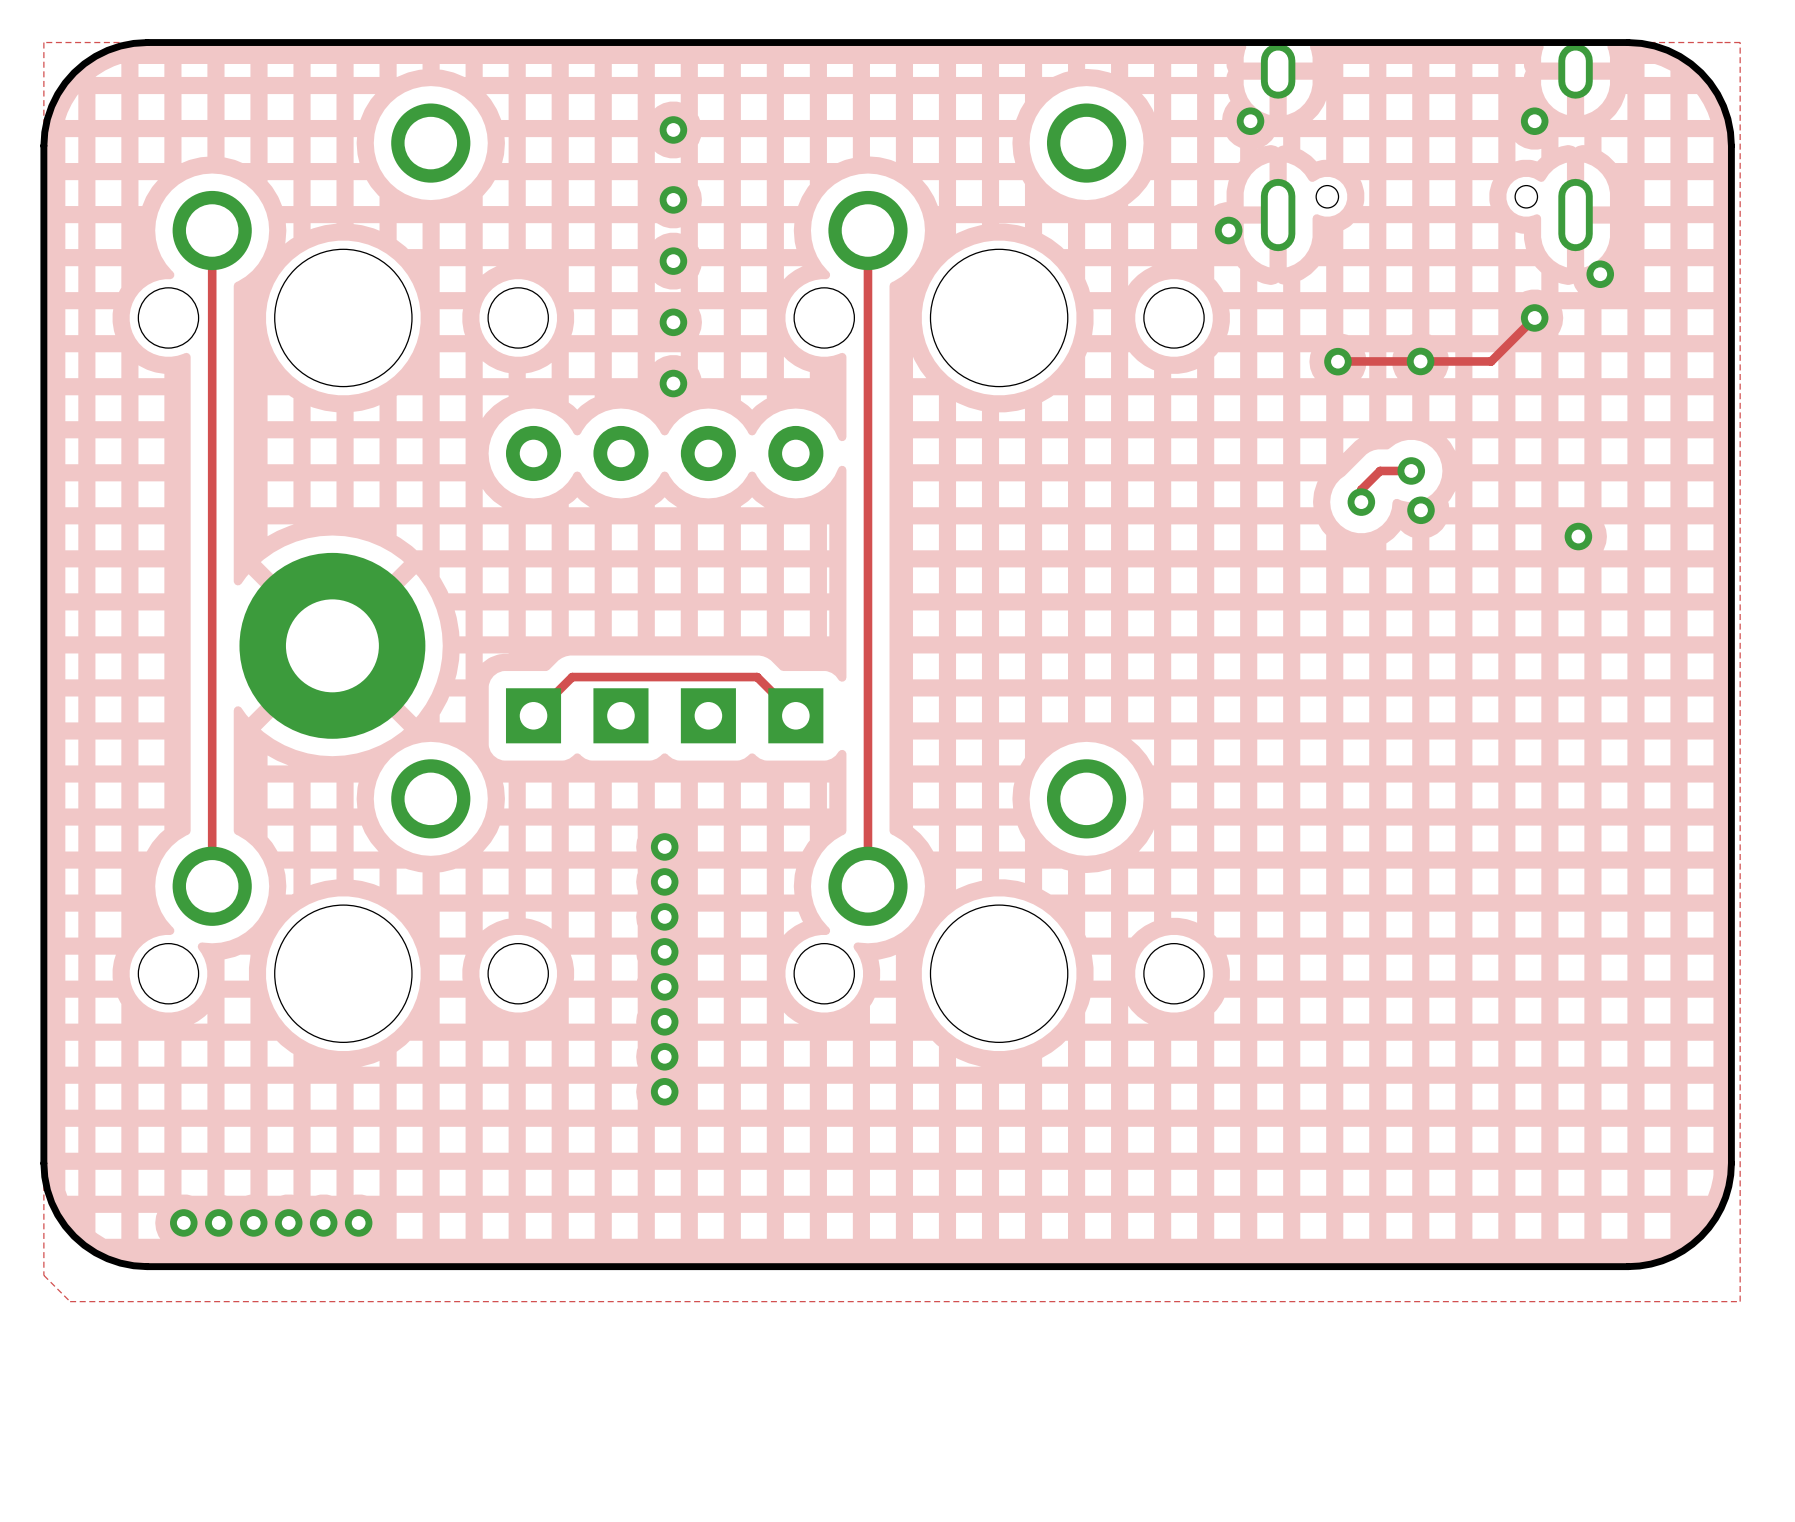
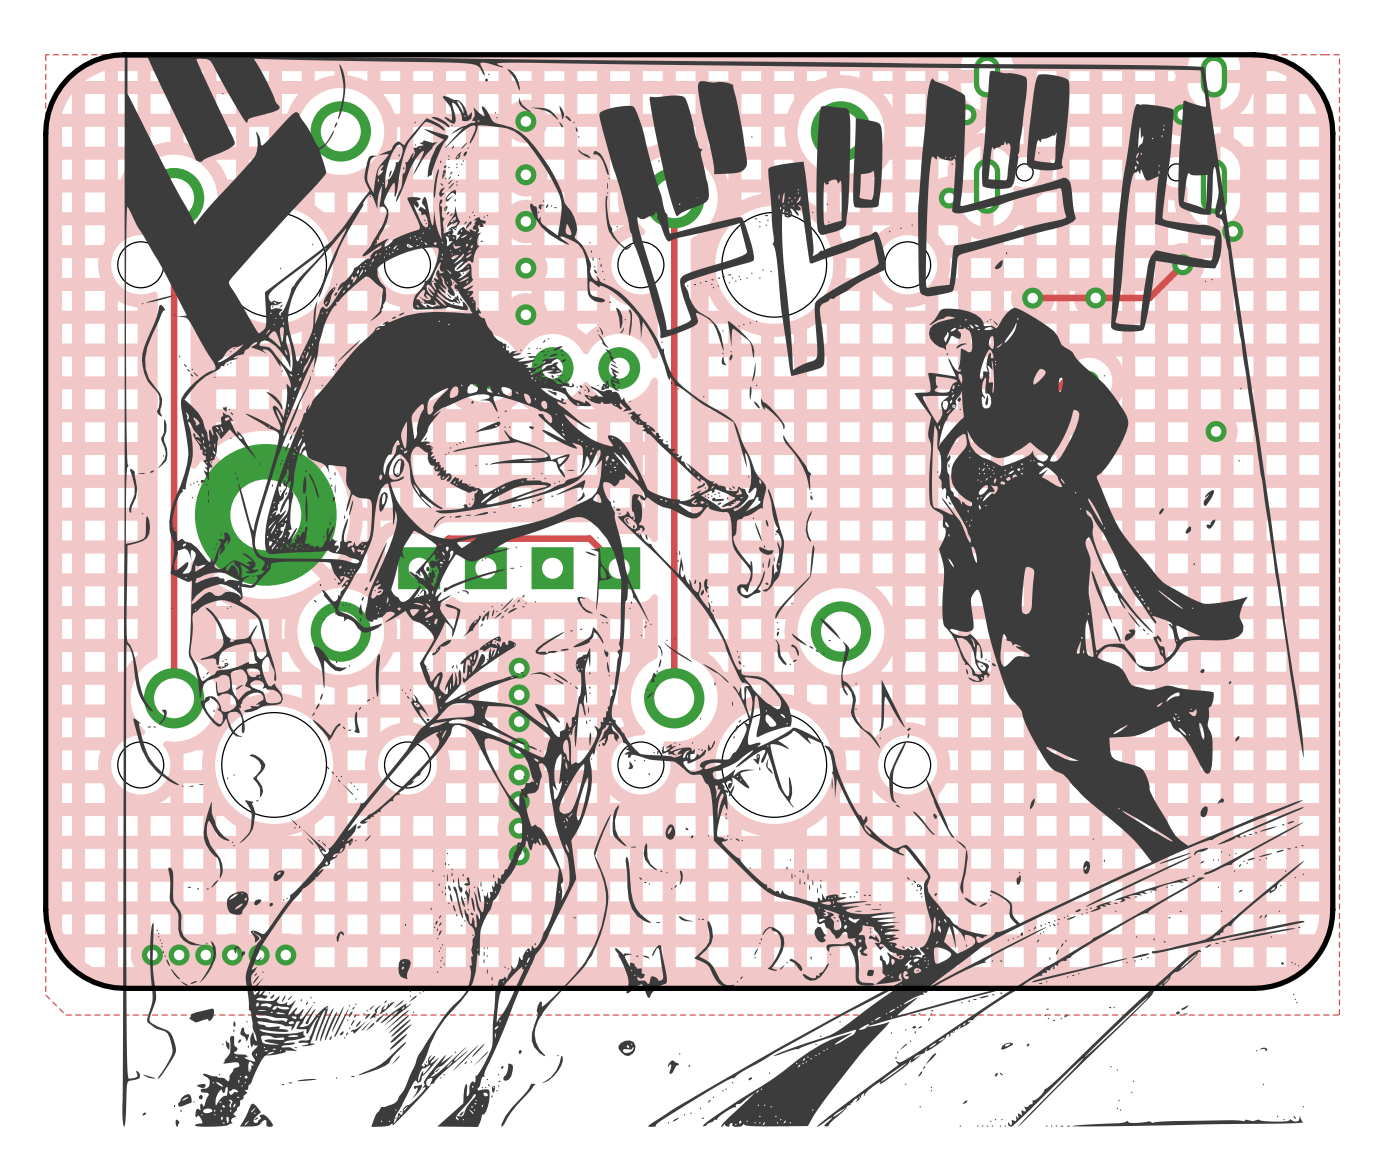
drawing: none -> [122, 54, 1305, 1127]

